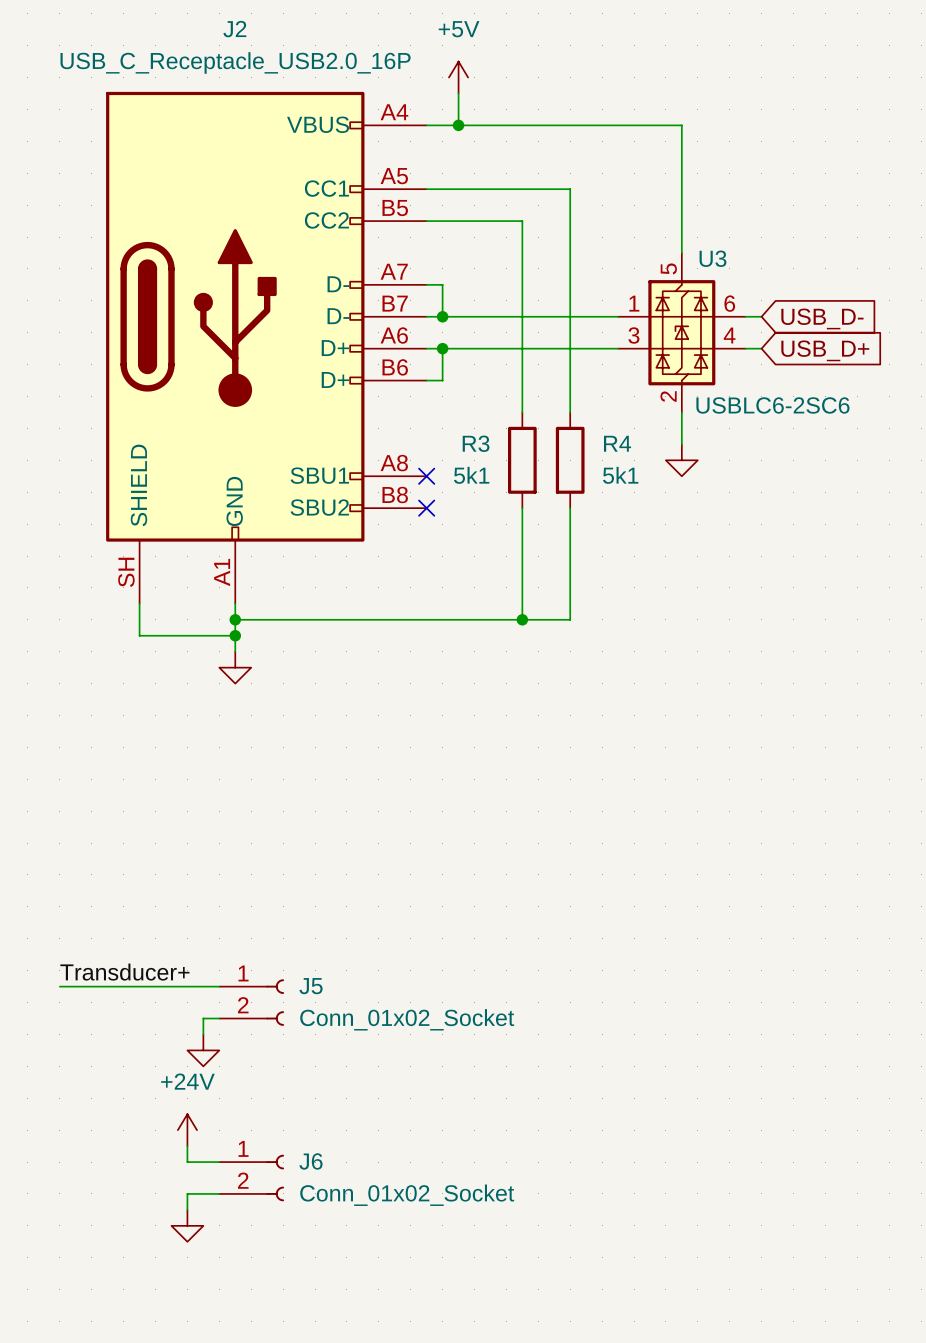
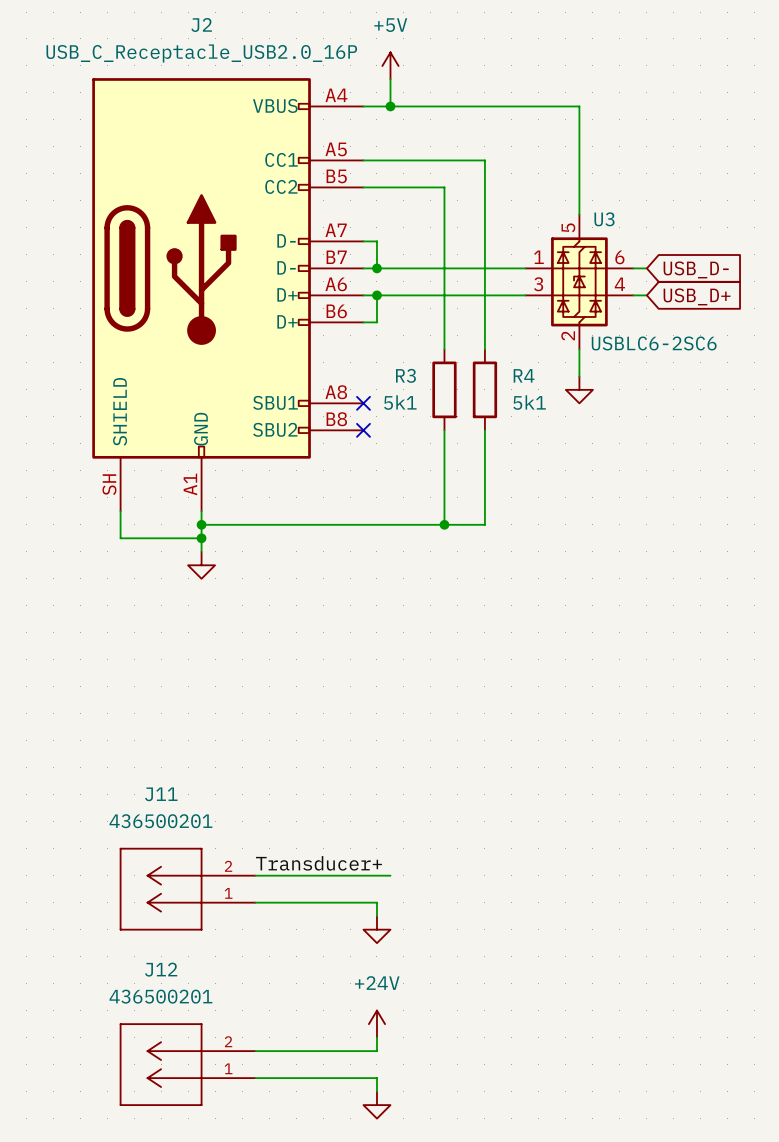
label position: Transducer+ (124, 972) -> Transducer+ (318, 863)
wire: (59, 986) (219, 986) -> (255, 875) (390, 875)
J5: Conn_01x02_Socket (251, 1002) -> none
wire: (219, 1018) (203, 1018) (203, 1034) -> none
power symbol: (203, 1050) -> none
J11: none -> 436500201 (187, 889)
wire: none -> (255, 902) (376, 902) (376, 916)
power symbol: none -> (376, 929)
power symbol position: +24V (187, 1130) -> +24V (376, 1024)
wire: (187, 1146) (187, 1162) (219, 1162) -> none
J6: Conn_01x02_Socket (251, 1178) -> none
wire: (219, 1193) (187, 1193) (187, 1209) -> none
power symbol: (187, 1225) -> none
wire: none -> (376, 1037) (376, 1051) (255, 1051)
J12: none -> 436500201 (187, 1064)
wire: none -> (255, 1078) (376, 1078) (376, 1091)
power symbol: none -> (376, 1105)

